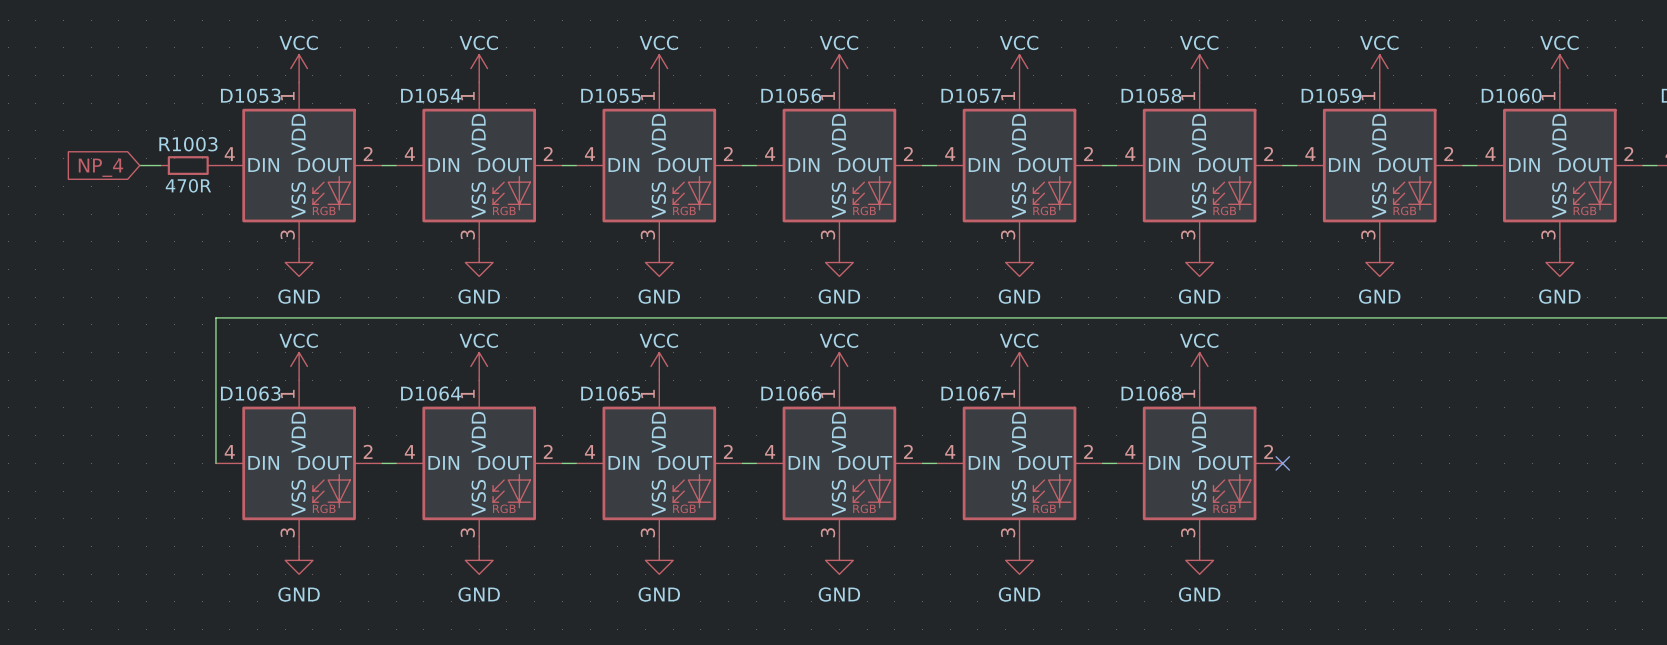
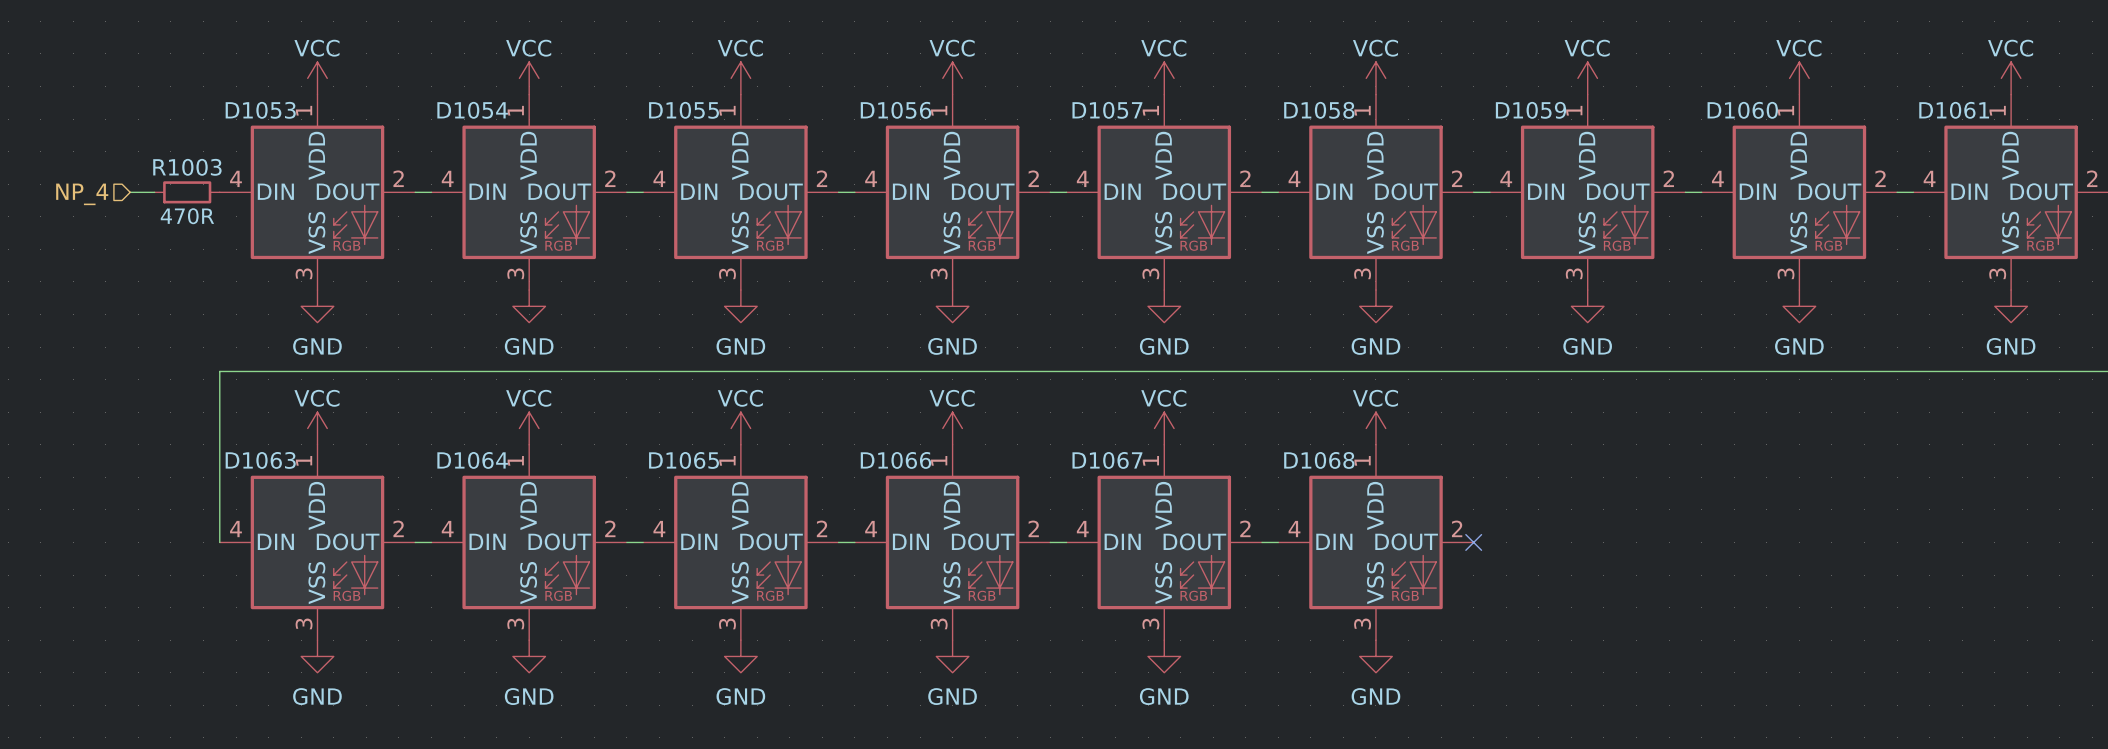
hierarchical label: none -> NP_4 (82, 194)
global label: NP_4 (100, 167) -> none

